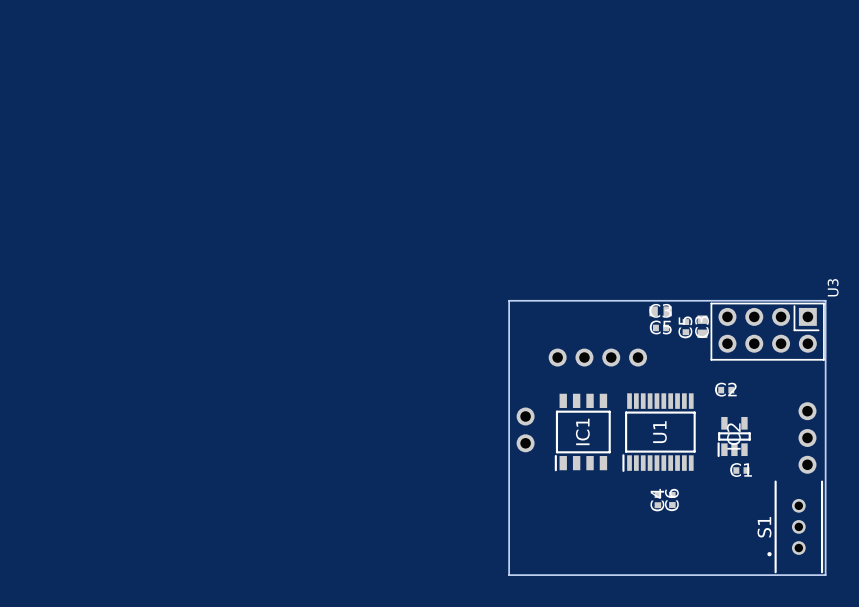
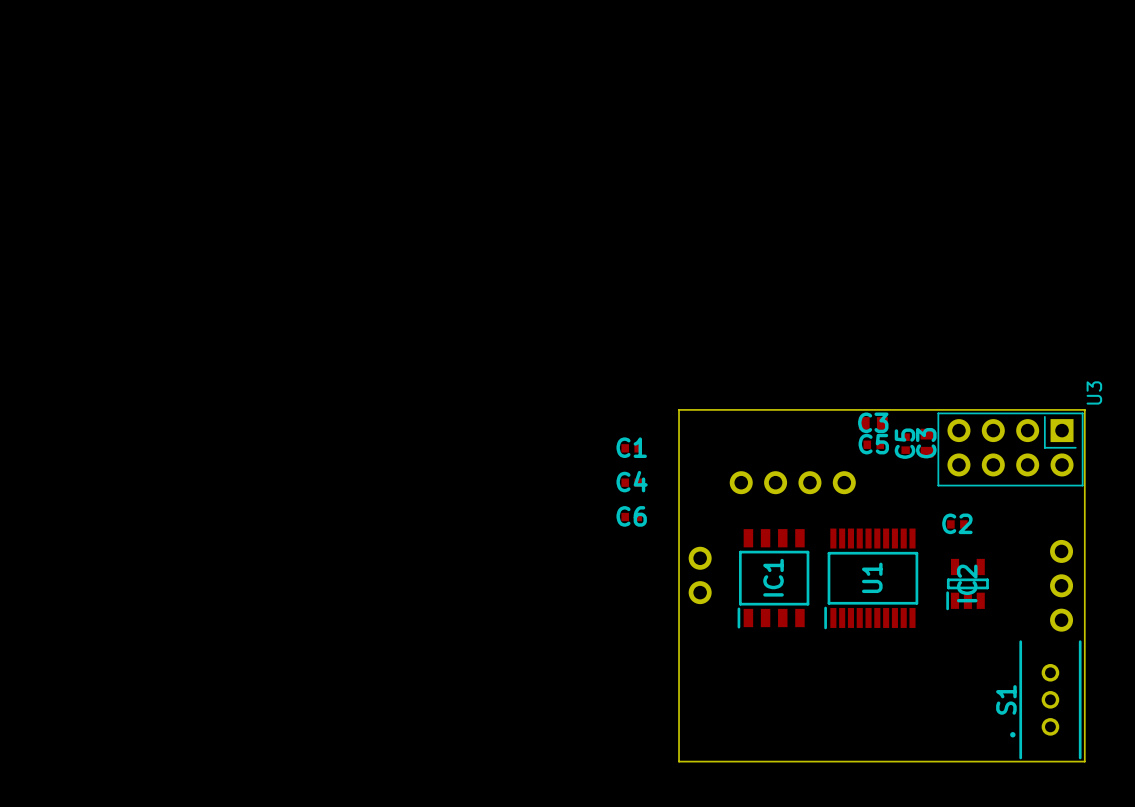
C1 position: (741, 470) -> (631, 448)
C6 rotation: 0° (672, 499) -> 90° clockwise (631, 517)
C6 position: (672, 499) -> (631, 517)
C4 rotation: 0° (657, 500) -> 90° clockwise (631, 482)
C4 position: (657, 500) -> (631, 482)

